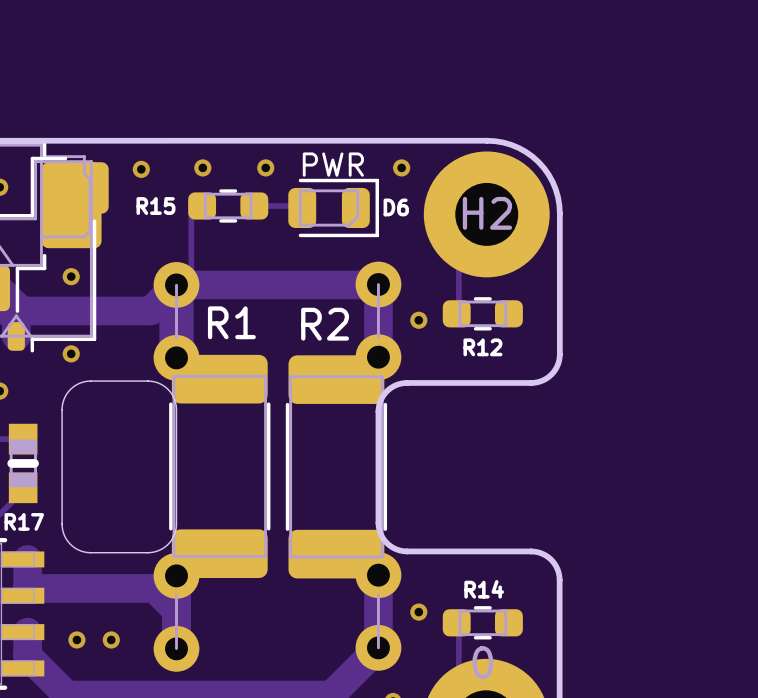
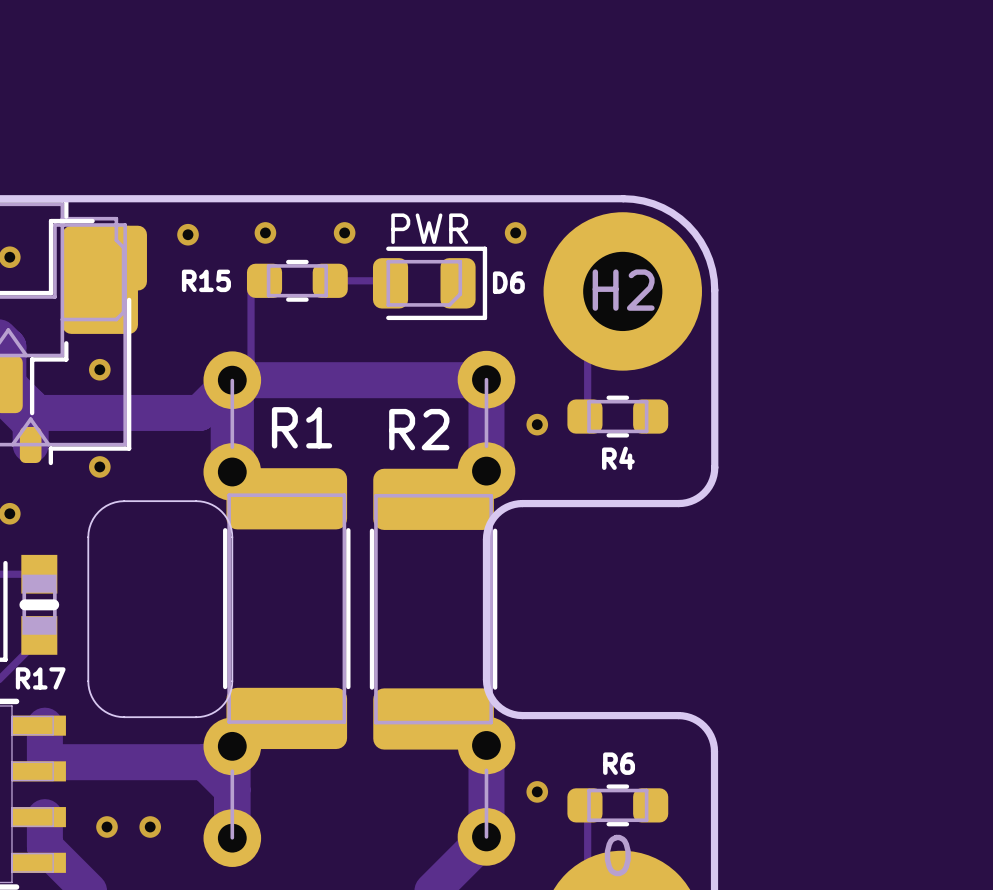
R12 name: R12 (482, 347) -> R4 (618, 458)
R14 name: R14 (484, 589) -> R6 (619, 763)

